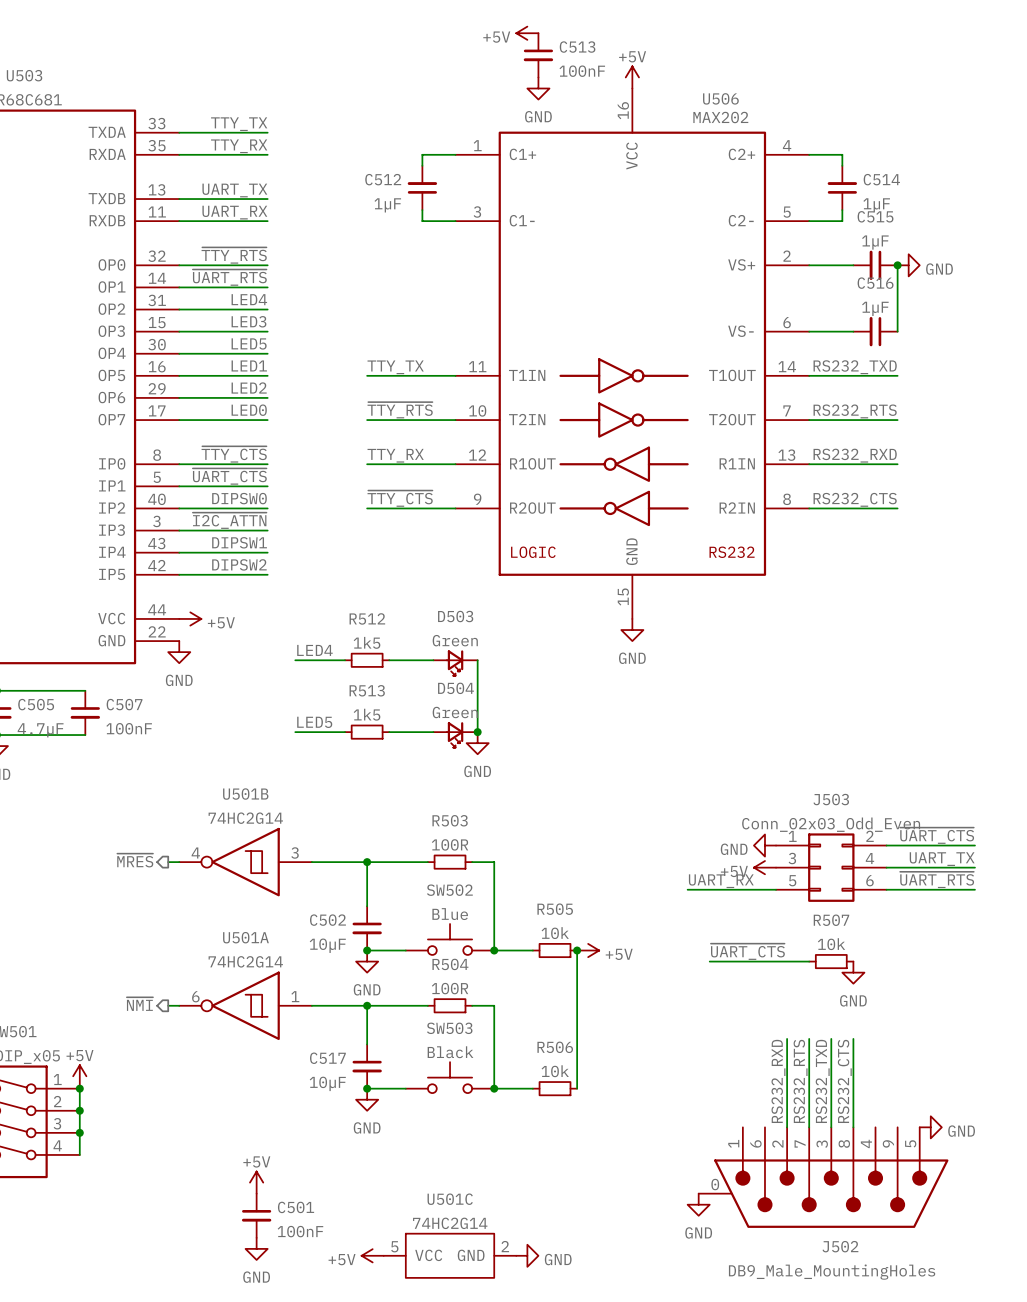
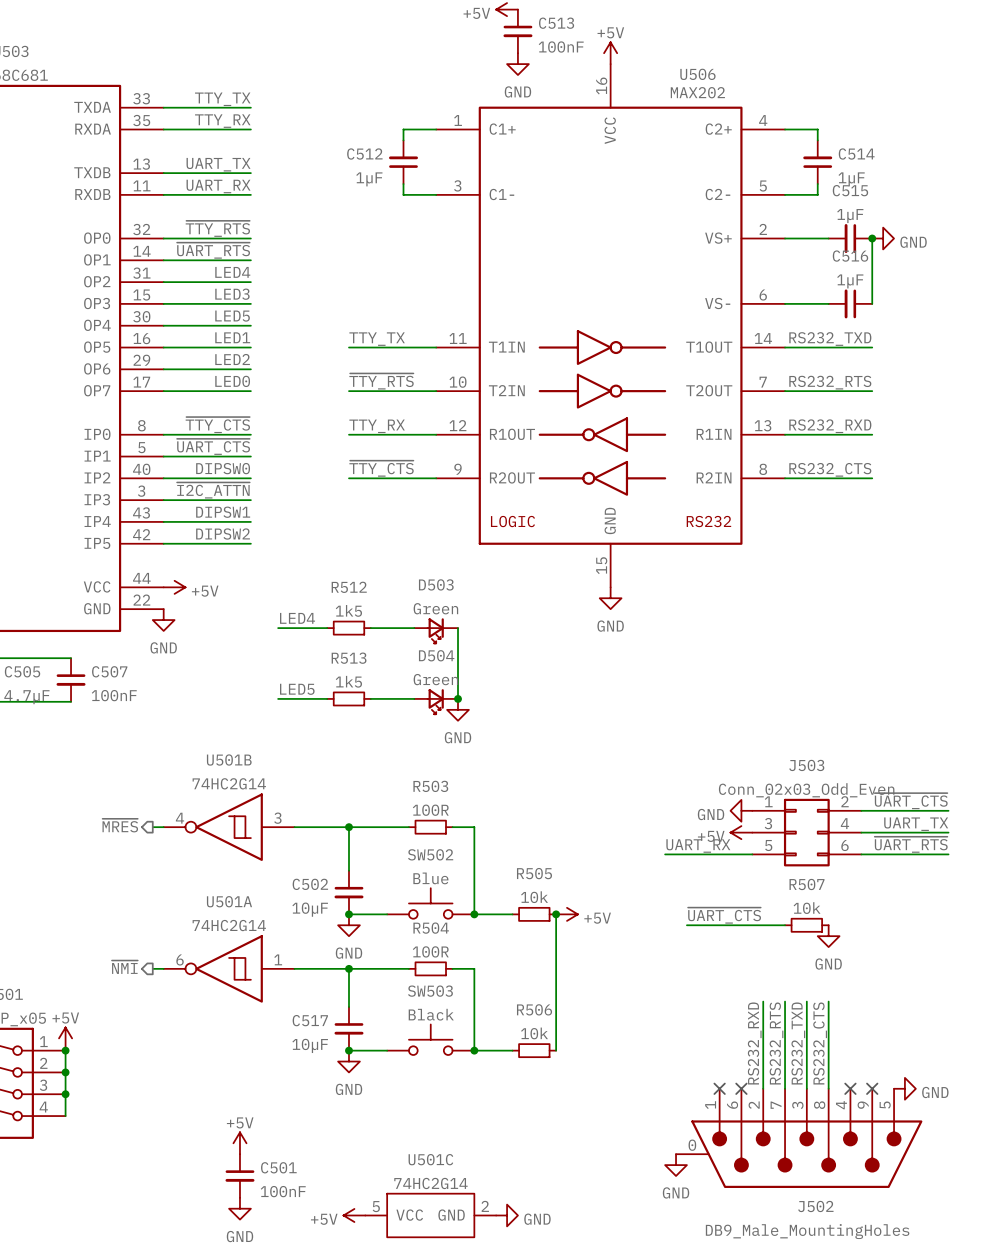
no-connect mark: none -> (719, 1088)
no-connect mark: none -> (741, 1088)
no-connect mark: none -> (850, 1088)
no-connect mark: none -> (872, 1088)

